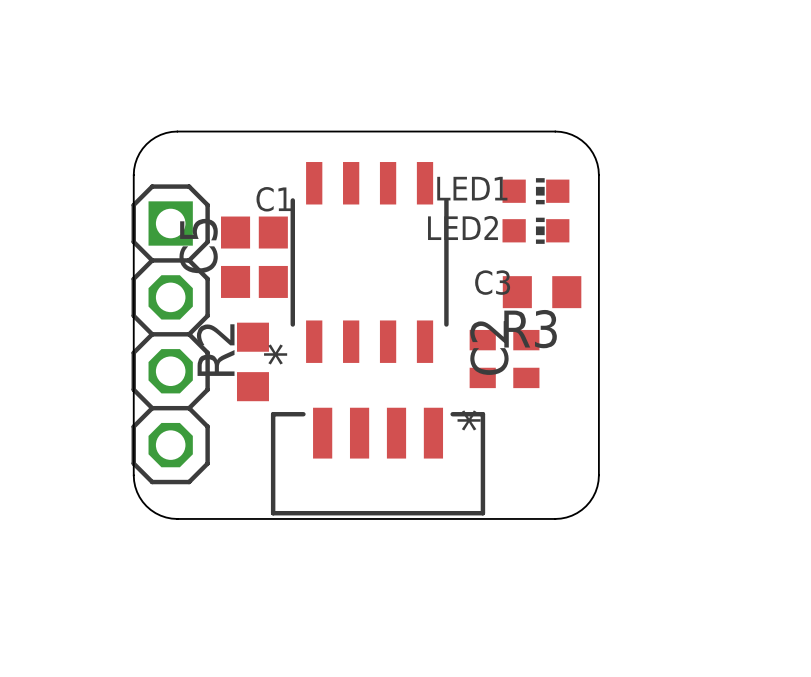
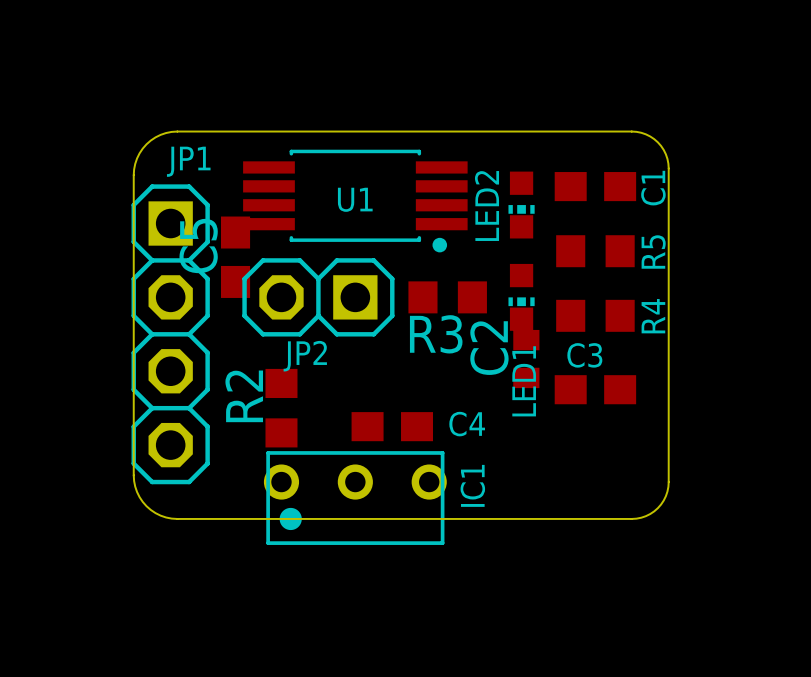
board edge: (555, 131) (571, 134) (586, 144) (595, 158) (598, 175) (598, 481) (595, 492) (586, 506) (571, 515) (555, 518) -> (555, 131) (641, 132) (650, 136) (661, 145) (667, 158) (668, 168) (667, 491) (657, 508) (641, 517) (555, 518)
JP1 name: none -> JP1 (188, 161)
LED1 name position: LED1 (472, 188) -> LED1 (524, 381)
LED1 rotation: 0° (535, 191) -> 90° clockwise (521, 297)
LED1 position: (535, 191) -> (521, 297)
U1: none -> (355, 201)
LED2 rotation: 0° (535, 230) -> 90° clockwise (521, 205)
R5: none -> (595, 251)
C1 rotation: 0° (273, 257) -> 90° clockwise (595, 186)
C1 position: (273, 257) -> (595, 186)
part: (369, 262) -> none
R3 position: (542, 292) -> (447, 297)
JP2: none -> (318, 297)
R4: none -> (595, 315)
C3 footprint: [469, 329, 496, 389] -> [554, 375, 637, 405]
R2 position: (252, 361) -> (281, 408)
C4: none -> (392, 426)
part: (378, 461) -> none
IC1: none -> (355, 498)

